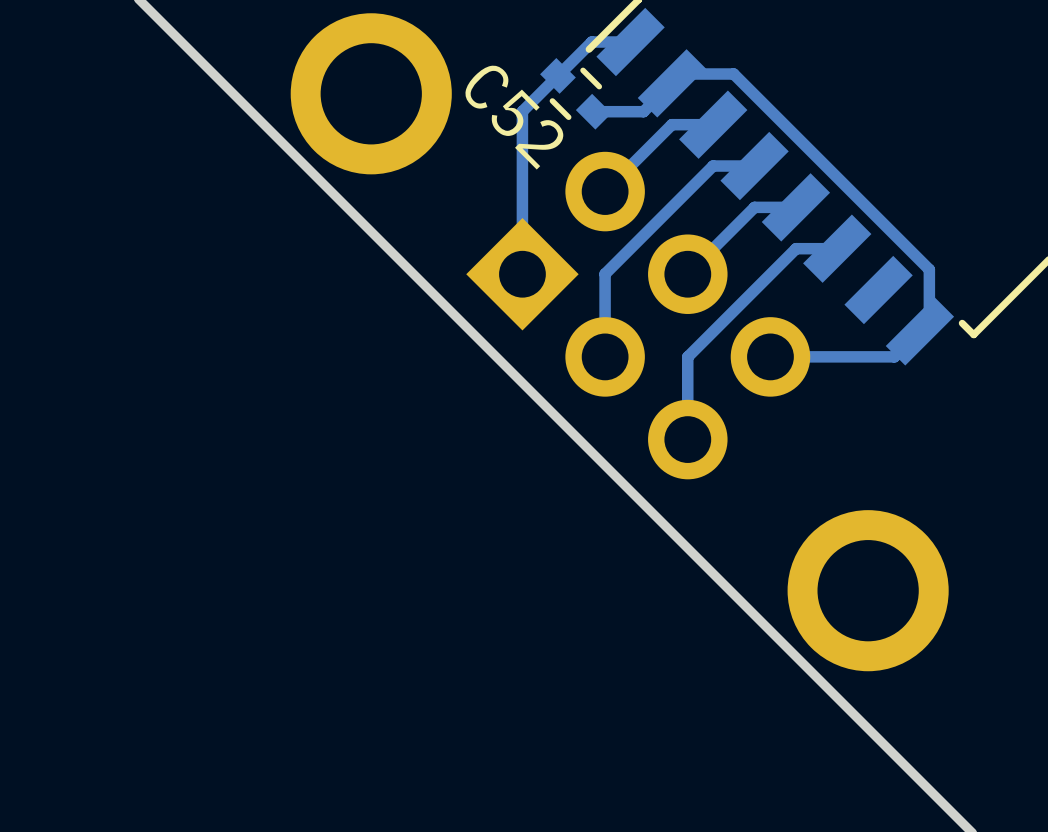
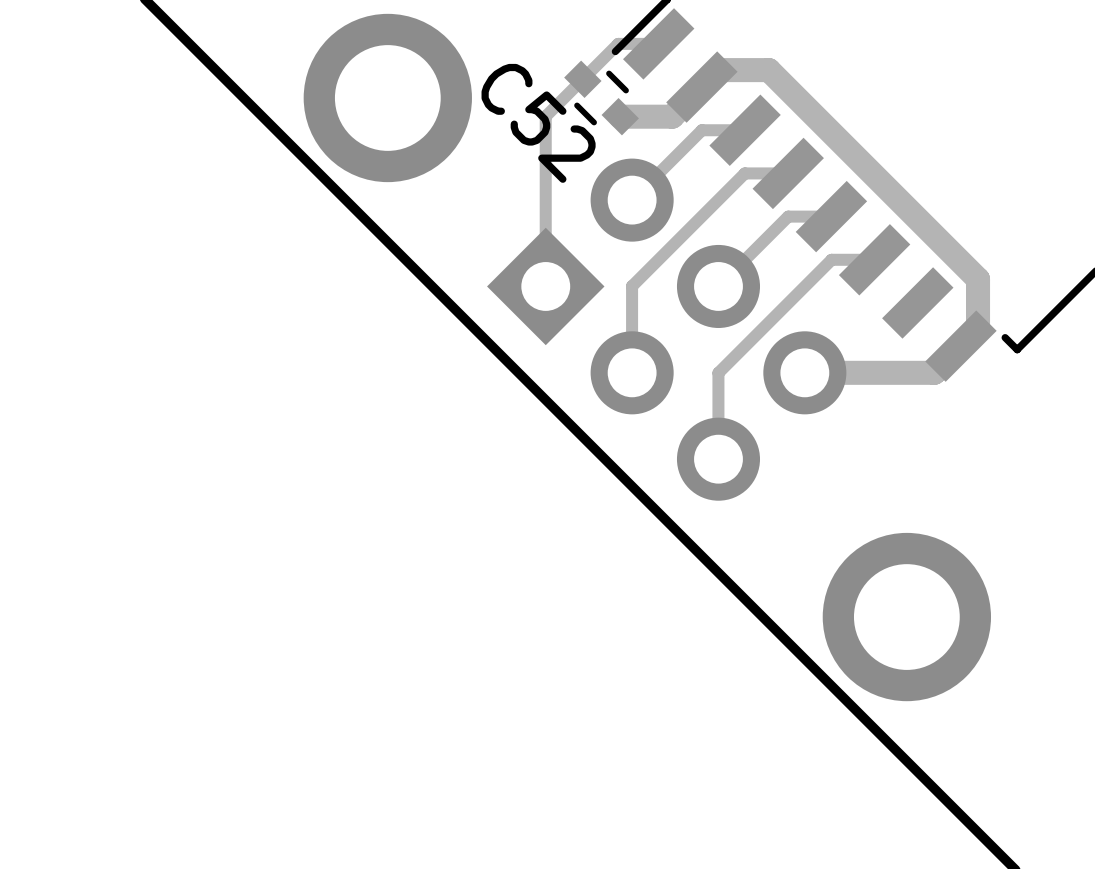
track: (681, 74) (733, 74) (929, 269) (929, 321) -> none
track: none -> (620, 116) (672, 116) (718, 70) (768, 70) (978, 279) (978, 329) (934, 372) (804, 372)

